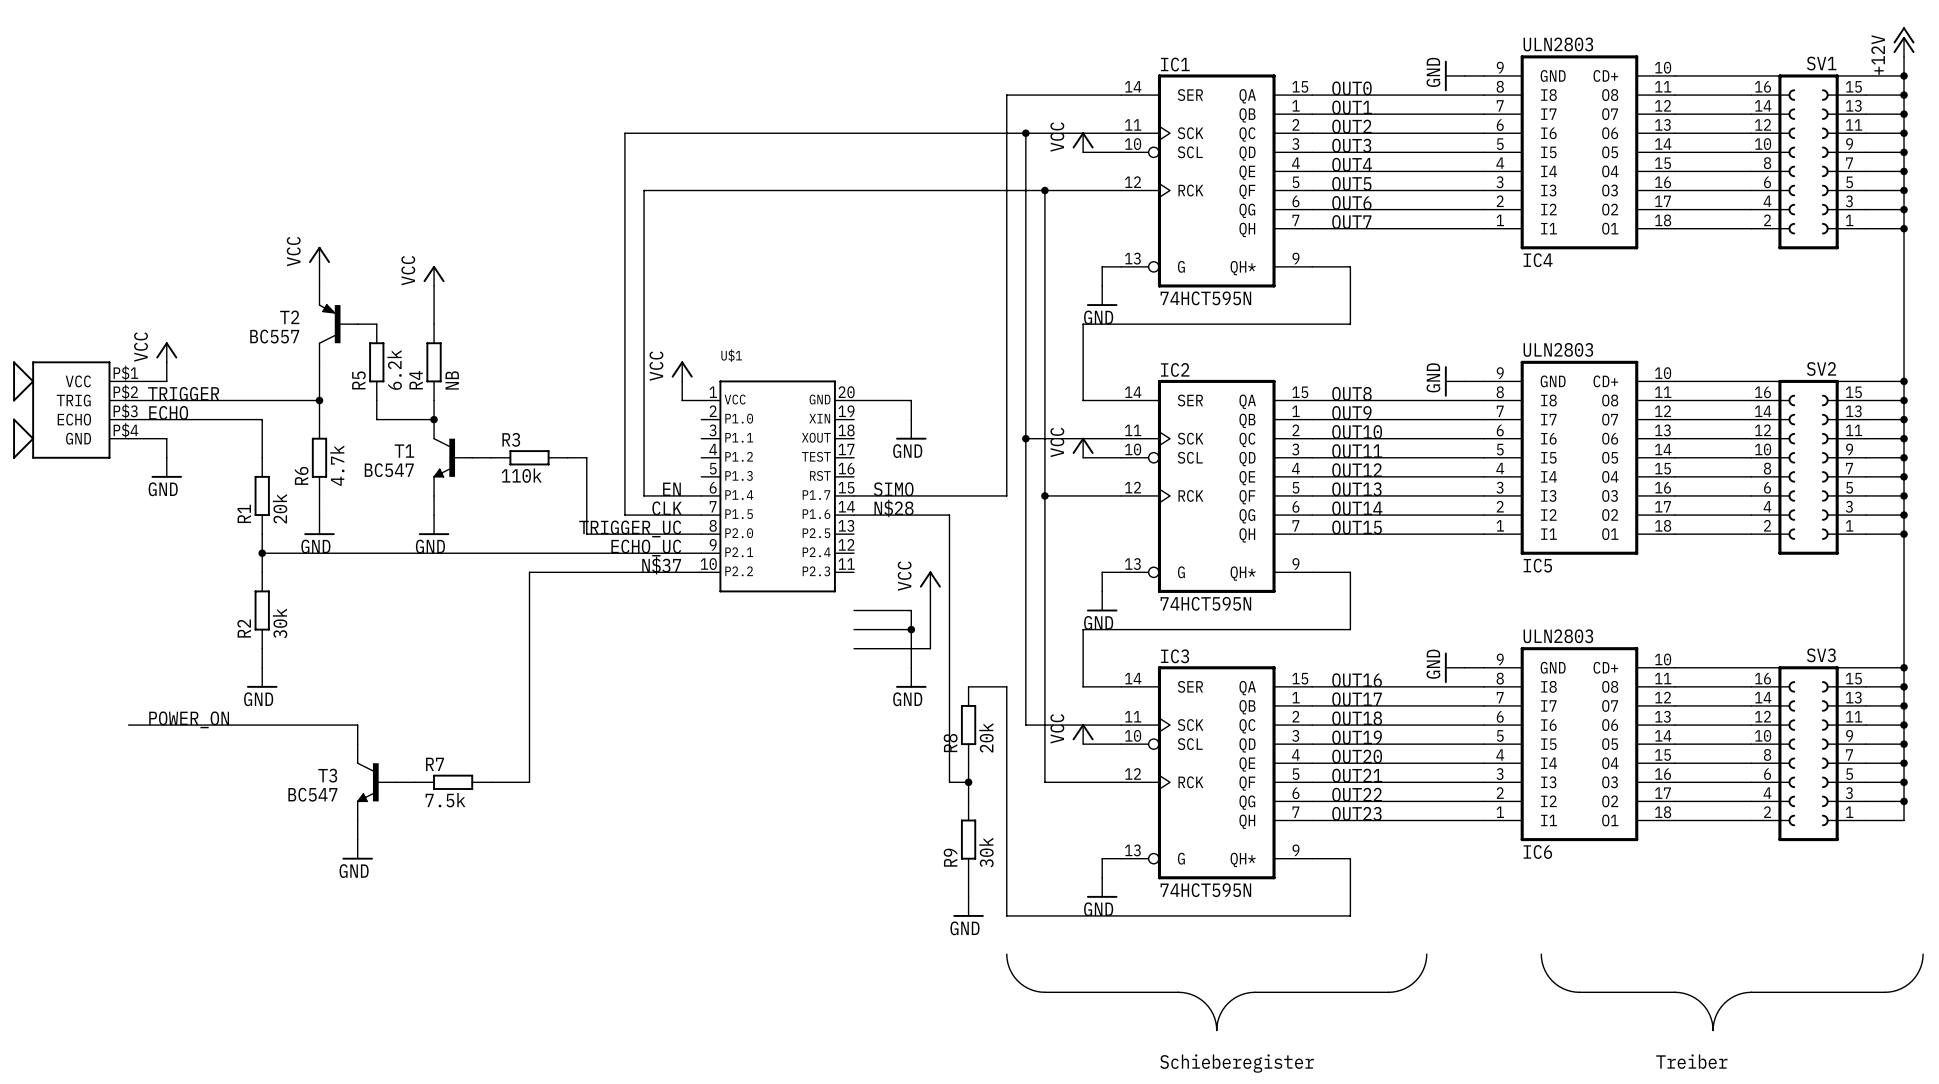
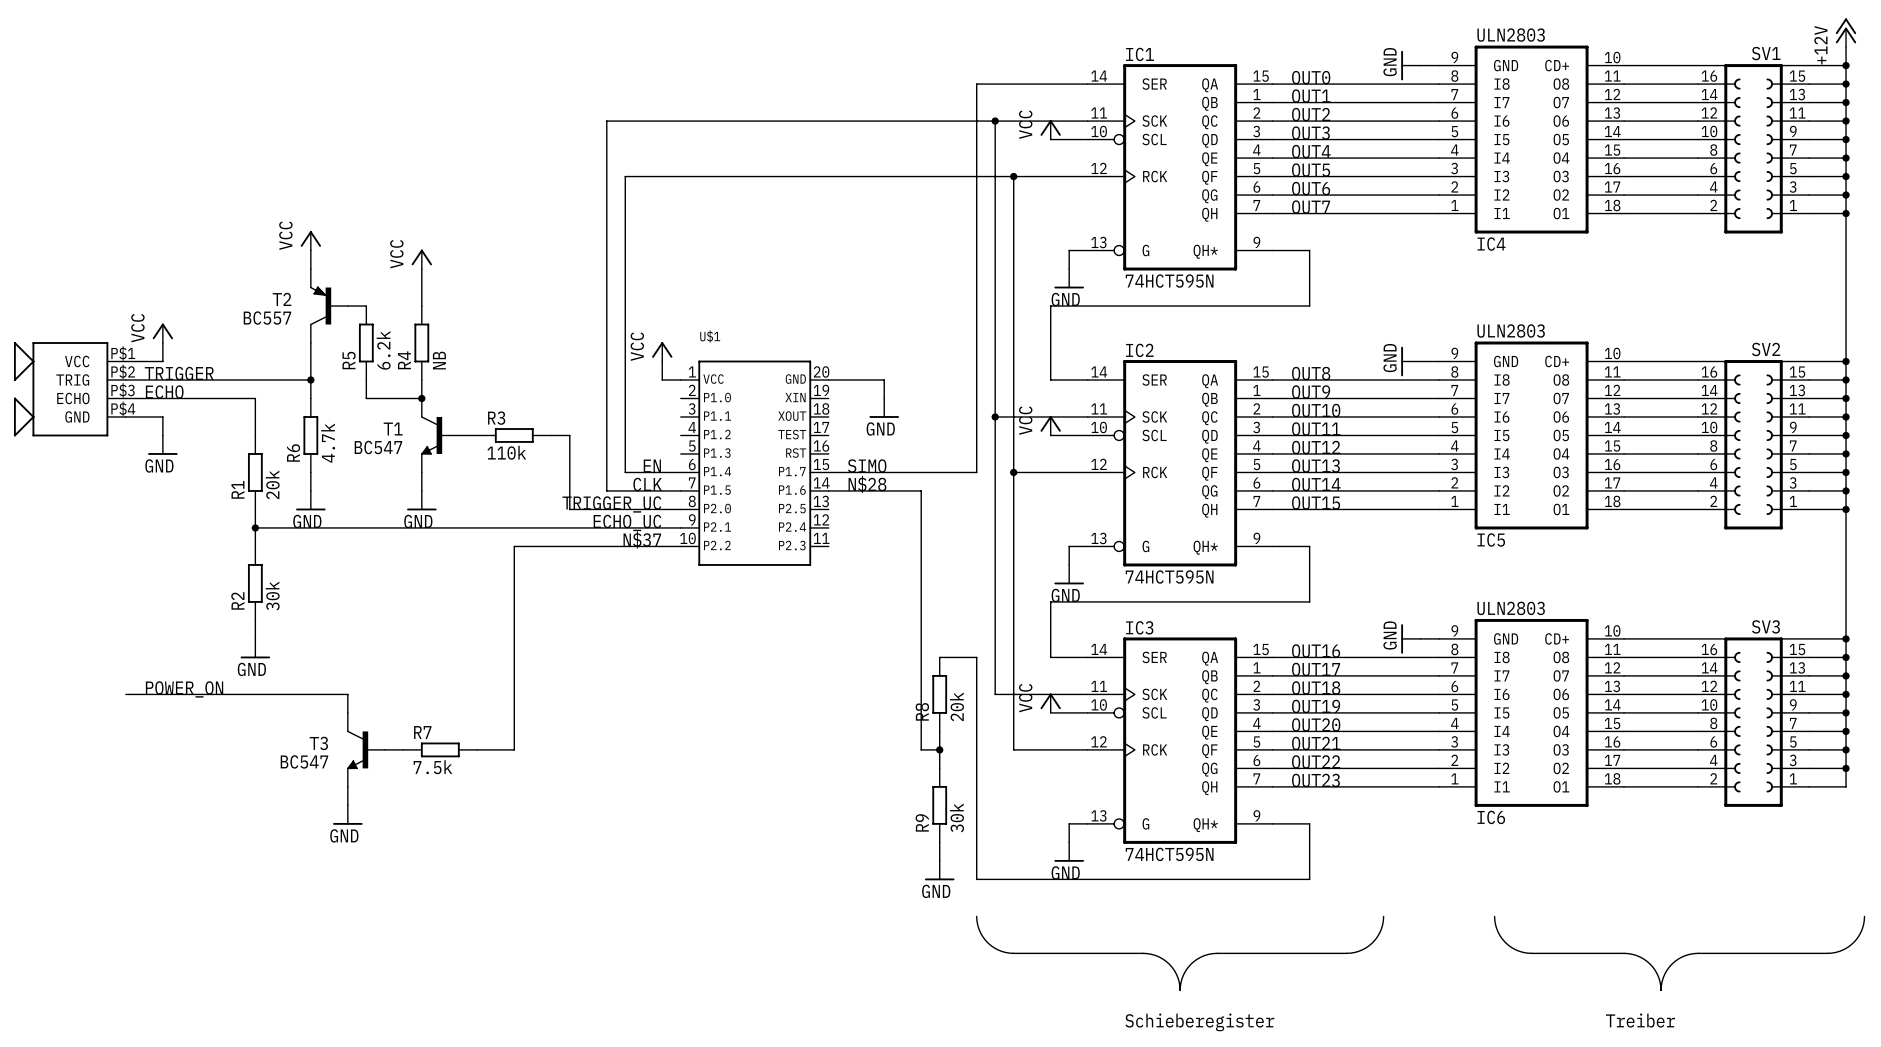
power symbol: VCC (930, 581) -> none
wire: (930, 591) (930, 648) (854, 648) -> none
wire: (854, 610) (911, 610) (911, 667) -> none
wire: (854, 629) (911, 629) -> none
junction: (911, 629) -> none
power symbol: GND (911, 677) -> none

